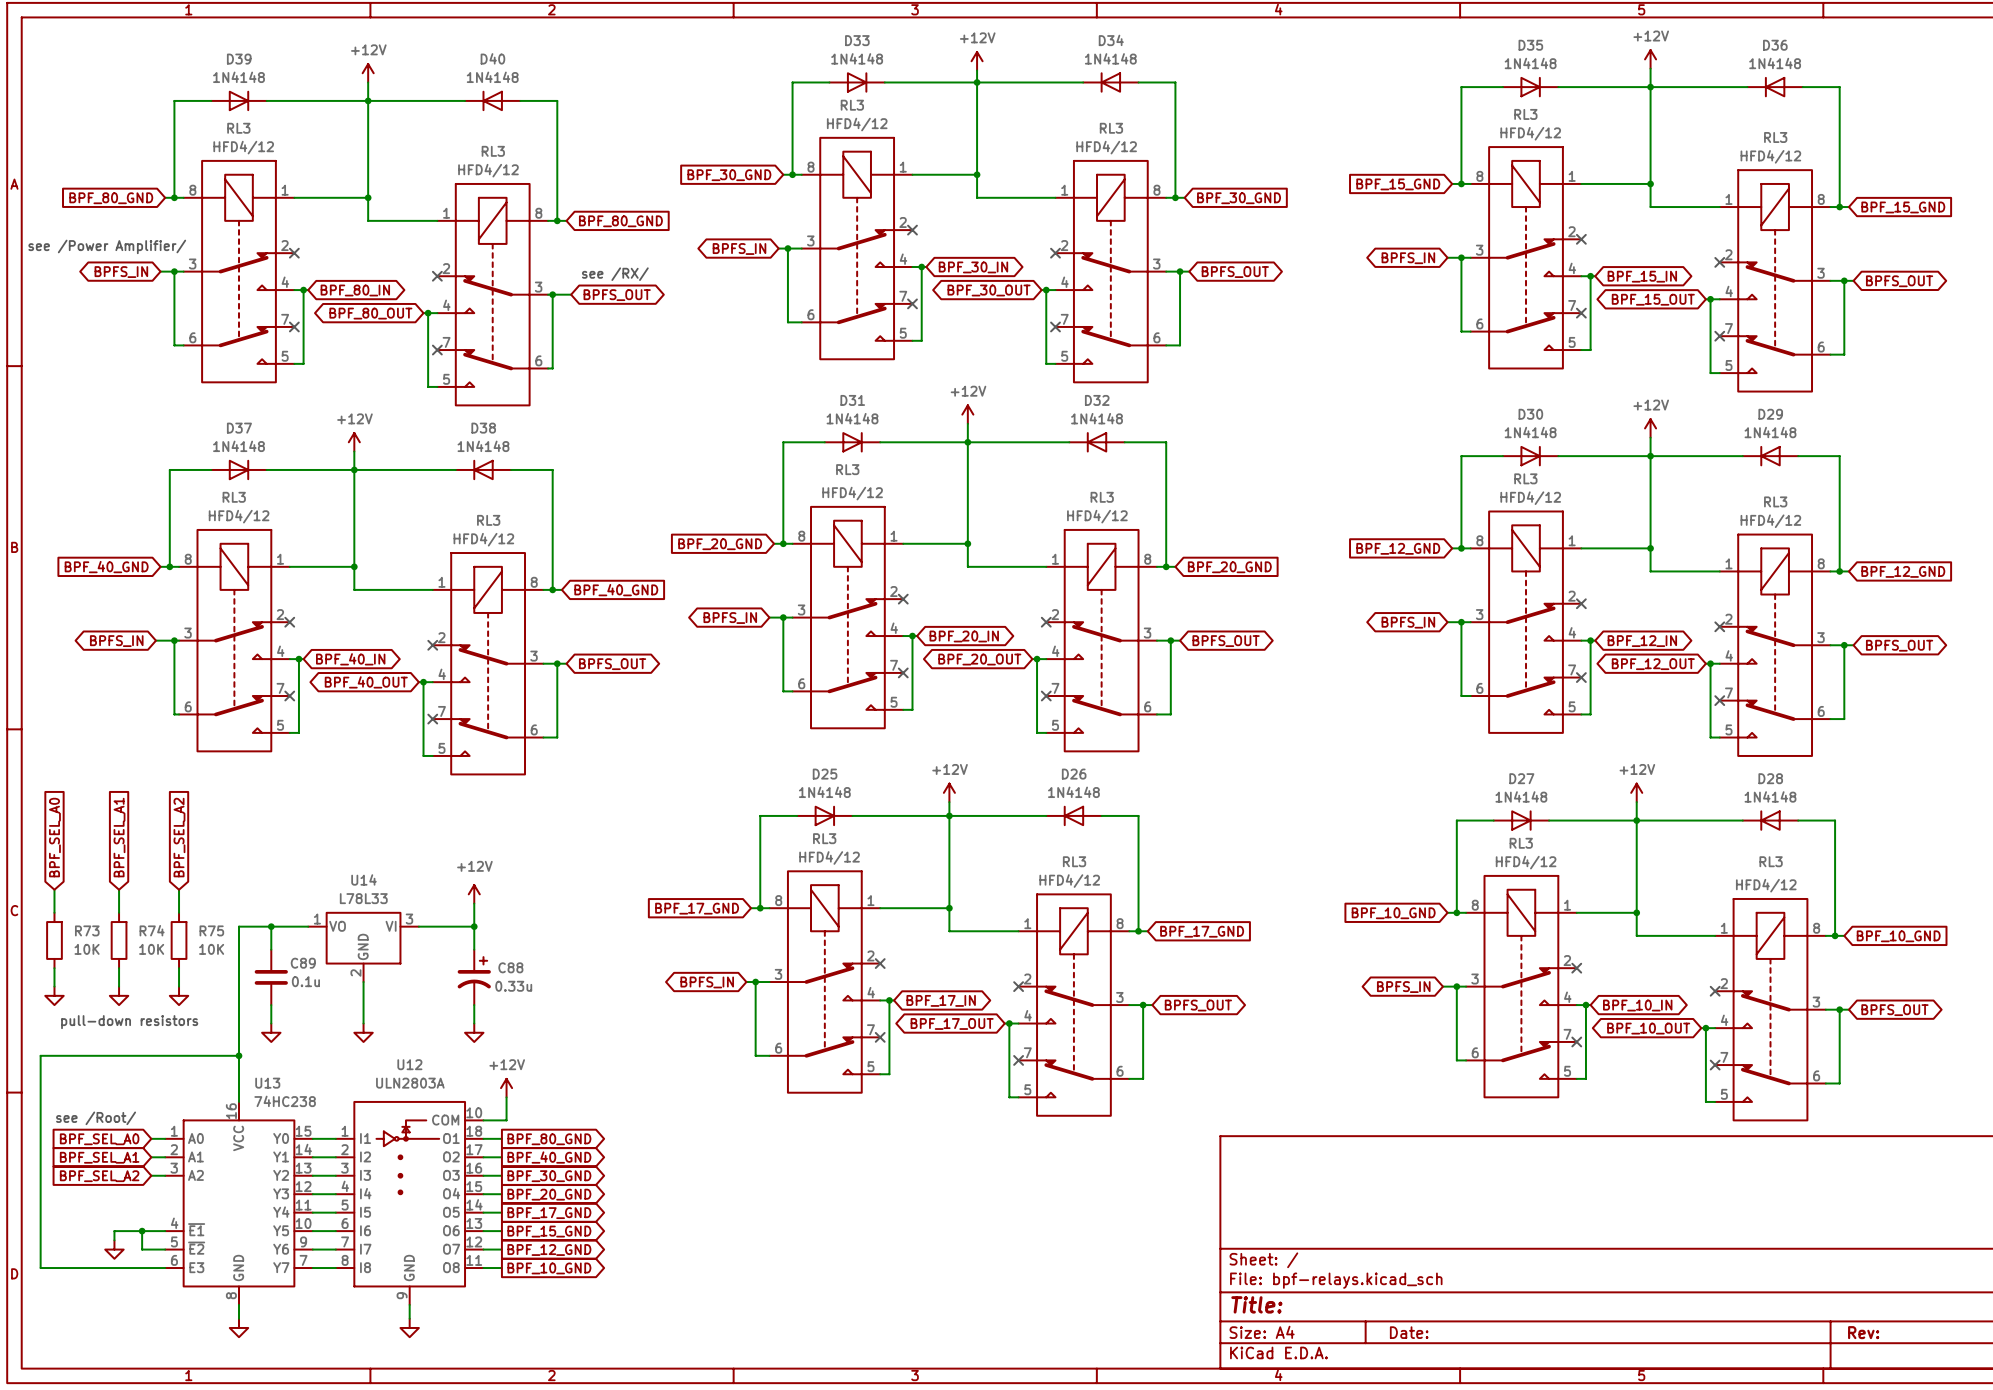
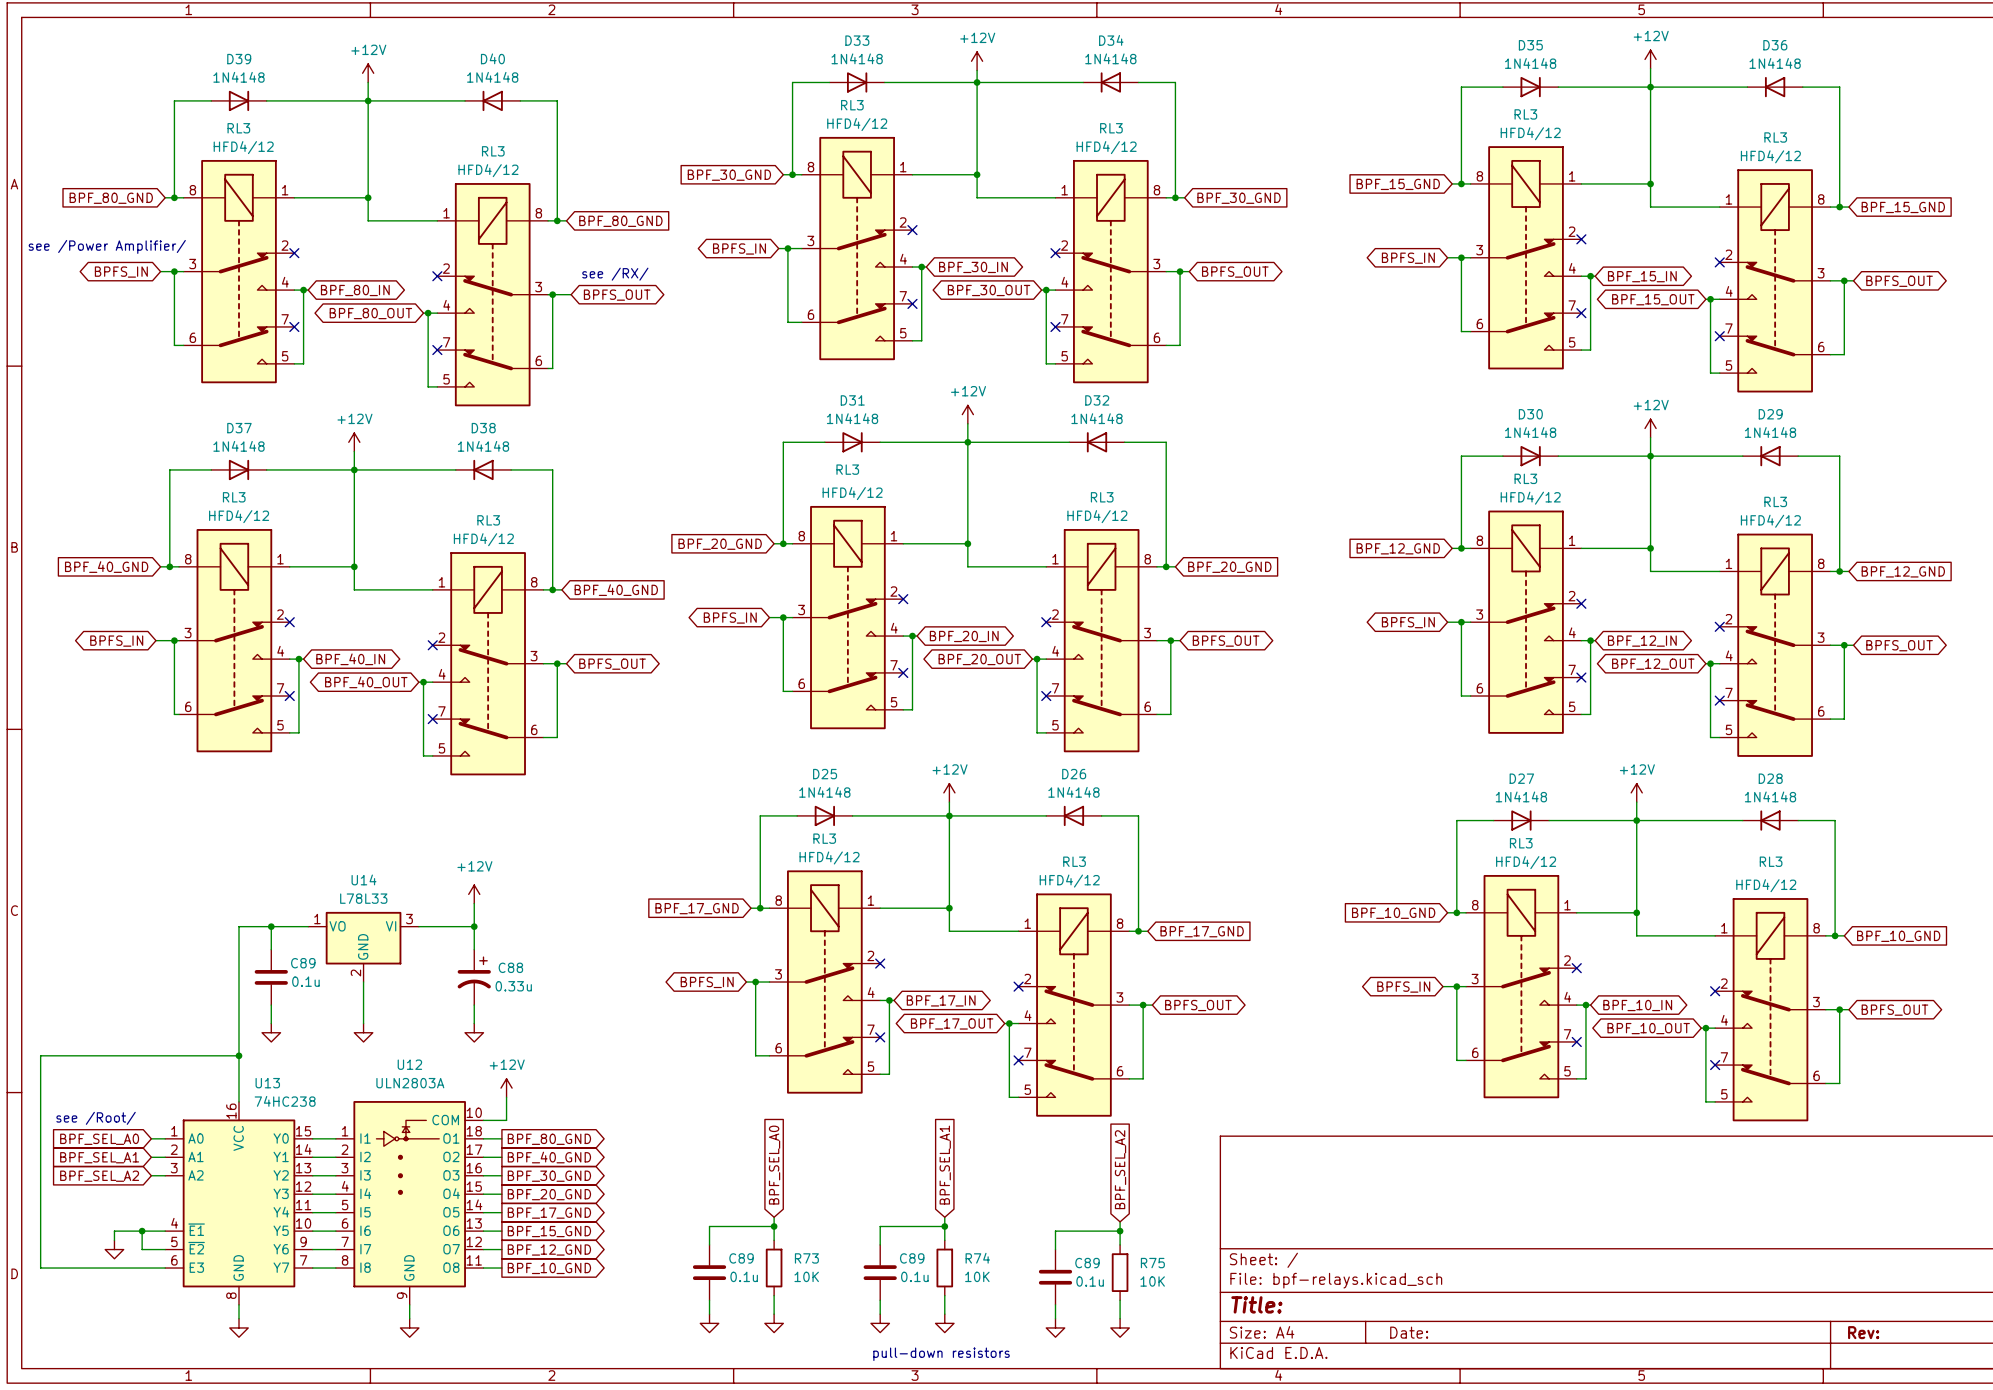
global label: BPF_SEL_A0 (54, 837) -> none
global label: BPF_SEL_A1 (119, 837) -> none
global label: BPF_SEL_A2 (179, 837) -> none
wire: (54, 889) (54, 912) -> none
wire: (119, 889) (119, 912) -> none
wire: (179, 889) (179, 912) -> none
R73 position: (54, 940) -> (774, 1268)
R74 position: (119, 940) -> (944, 1268)
R75 position: (179, 940) -> (1120, 1272)
wire: (54, 968) (54, 986) -> none
wire: (119, 968) (119, 986) -> none
wire: (179, 968) (179, 986) -> none
power symbol: (54, 995) -> none
power symbol: (119, 995) -> none
power symbol: (179, 995) -> none
text: pull-down resistors (129, 1022) -> none
global label: none -> BPF_SEL_A0 (774, 1165)
global label: none -> BPF_SEL_A1 (945, 1165)
global label: none -> BPF_SEL_A2 (1120, 1169)
wire: none -> (774, 1217) (774, 1240)
wire: none -> (944, 1217) (944, 1240)
wire: none -> (1120, 1221) (1120, 1244)
wire: none -> (774, 1226) (709, 1226) (709, 1244)
junction: none -> (774, 1226)
wire: none -> (944, 1226) (880, 1226) (880, 1244)
junction: none -> (944, 1226)
wire: none -> (1120, 1231) (1055, 1231) (1055, 1249)
junction: none -> (1120, 1231)
C89: none -> 0.1u (709, 1272)
C89: none -> 0.1u (880, 1272)
C89: none -> 0.1u (1055, 1277)
wire: none -> (774, 1295) (774, 1314)
wire: none -> (944, 1295) (944, 1314)
wire: none -> (709, 1300) (709, 1314)
wire: none -> (880, 1300) (880, 1314)
wire: none -> (1120, 1300) (1120, 1318)
wire: none -> (1055, 1304) (1055, 1318)
power symbol: none -> (709, 1323)
power symbol: none -> (774, 1323)
power symbol: none -> (880, 1323)
power symbol: none -> (944, 1323)
power symbol: none -> (1055, 1327)
power symbol: none -> (1120, 1327)
text: none -> pull-down resistors (941, 1354)

